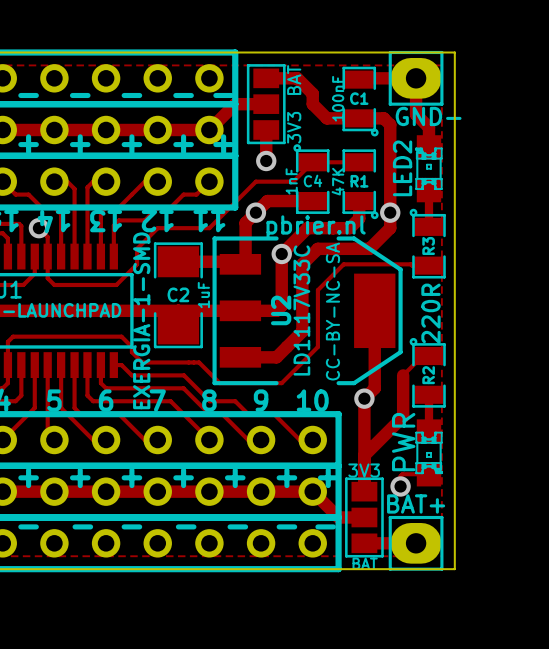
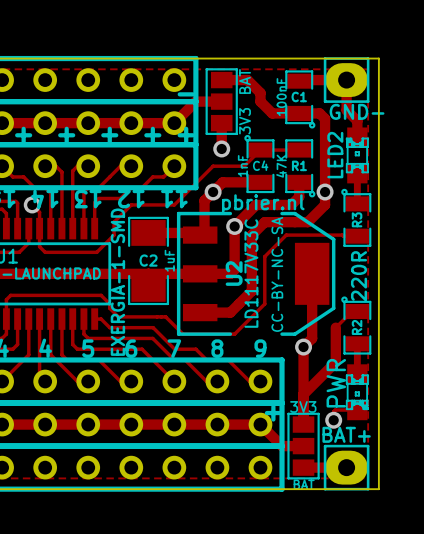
text: - (28, 95) -> none
text: - (80, 95) -> none
text: - (131, 95) -> none
text: - (183, 95) -> none
text: 5 (54, 400) -> 4 (45, 348)
text: 6 (106, 400) -> 5 (88, 348)
text: 7 (157, 400) -> 6 (131, 348)
text: 8 (209, 400) -> 7 (174, 348)
text: 9 (261, 400) -> 8 (217, 348)
text: 10 (312, 400) -> 9 (260, 348)
text: + (28, 477) -> none
text: + (80, 477) -> none
text: + (131, 477) -> none
text: + (183, 477) -> none
text: + (235, 477) -> none
text: + (286, 477) -> none
text: - (28, 526) -> none
text: - (82, 526) -> none
text: - (131, 526) -> none
text: - (186, 526) -> none
text: - (237, 526) -> none
text: - (286, 526) -> none
text: - (325, 526) -> none

